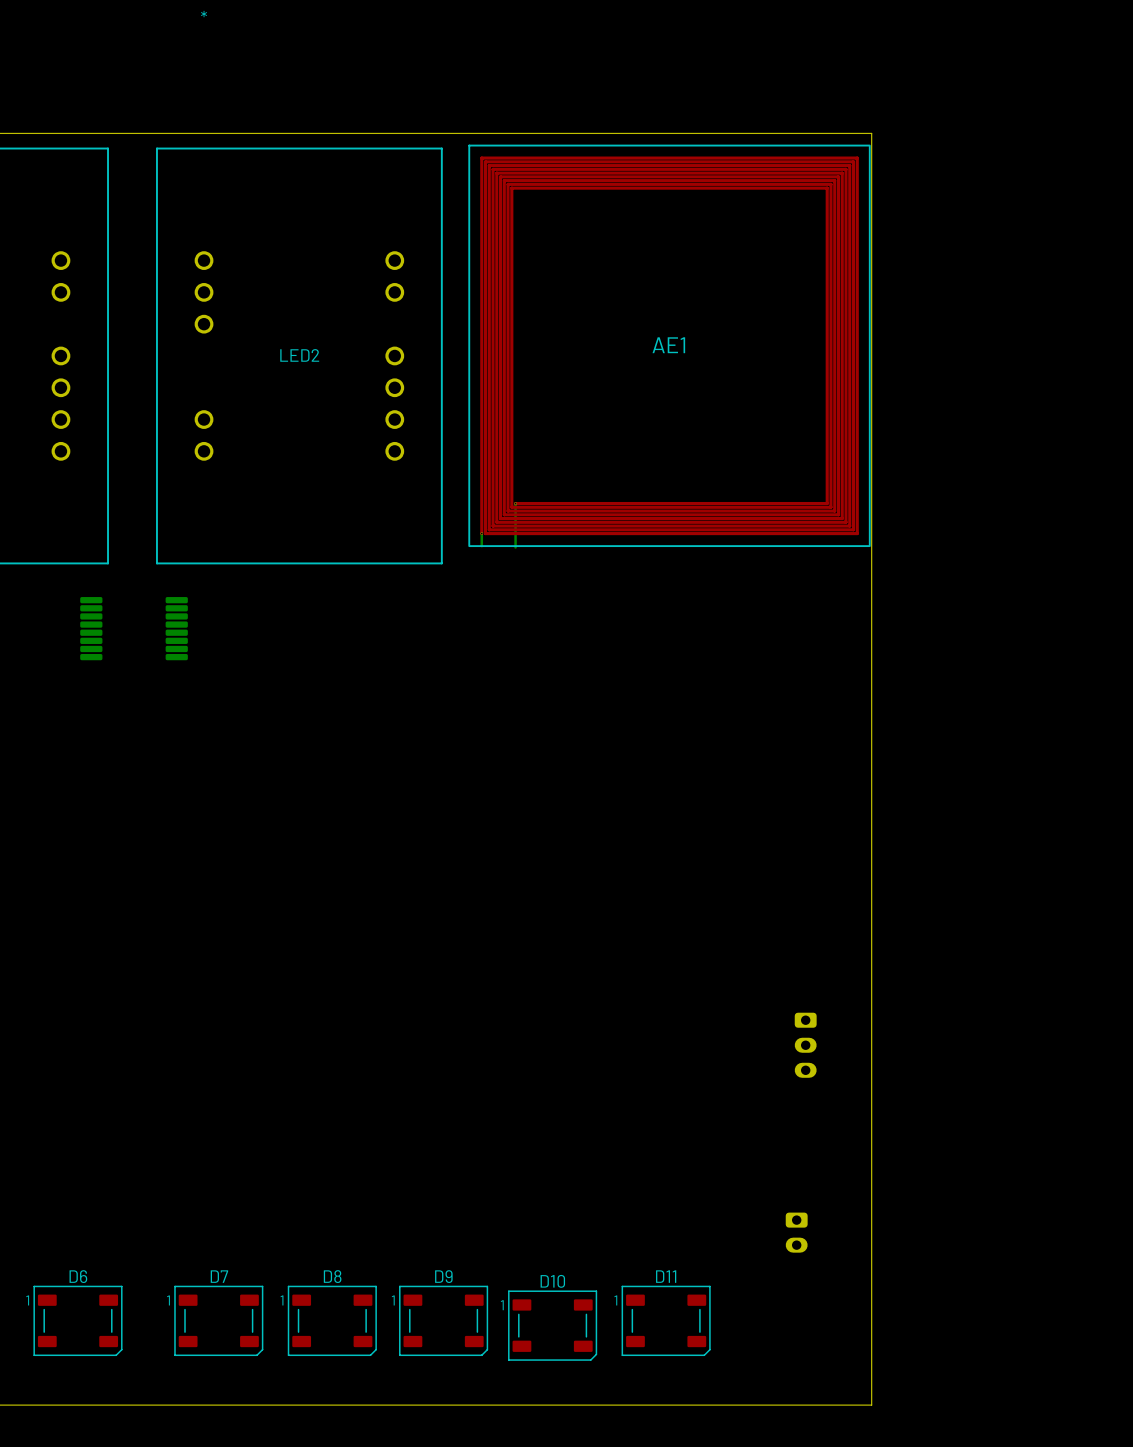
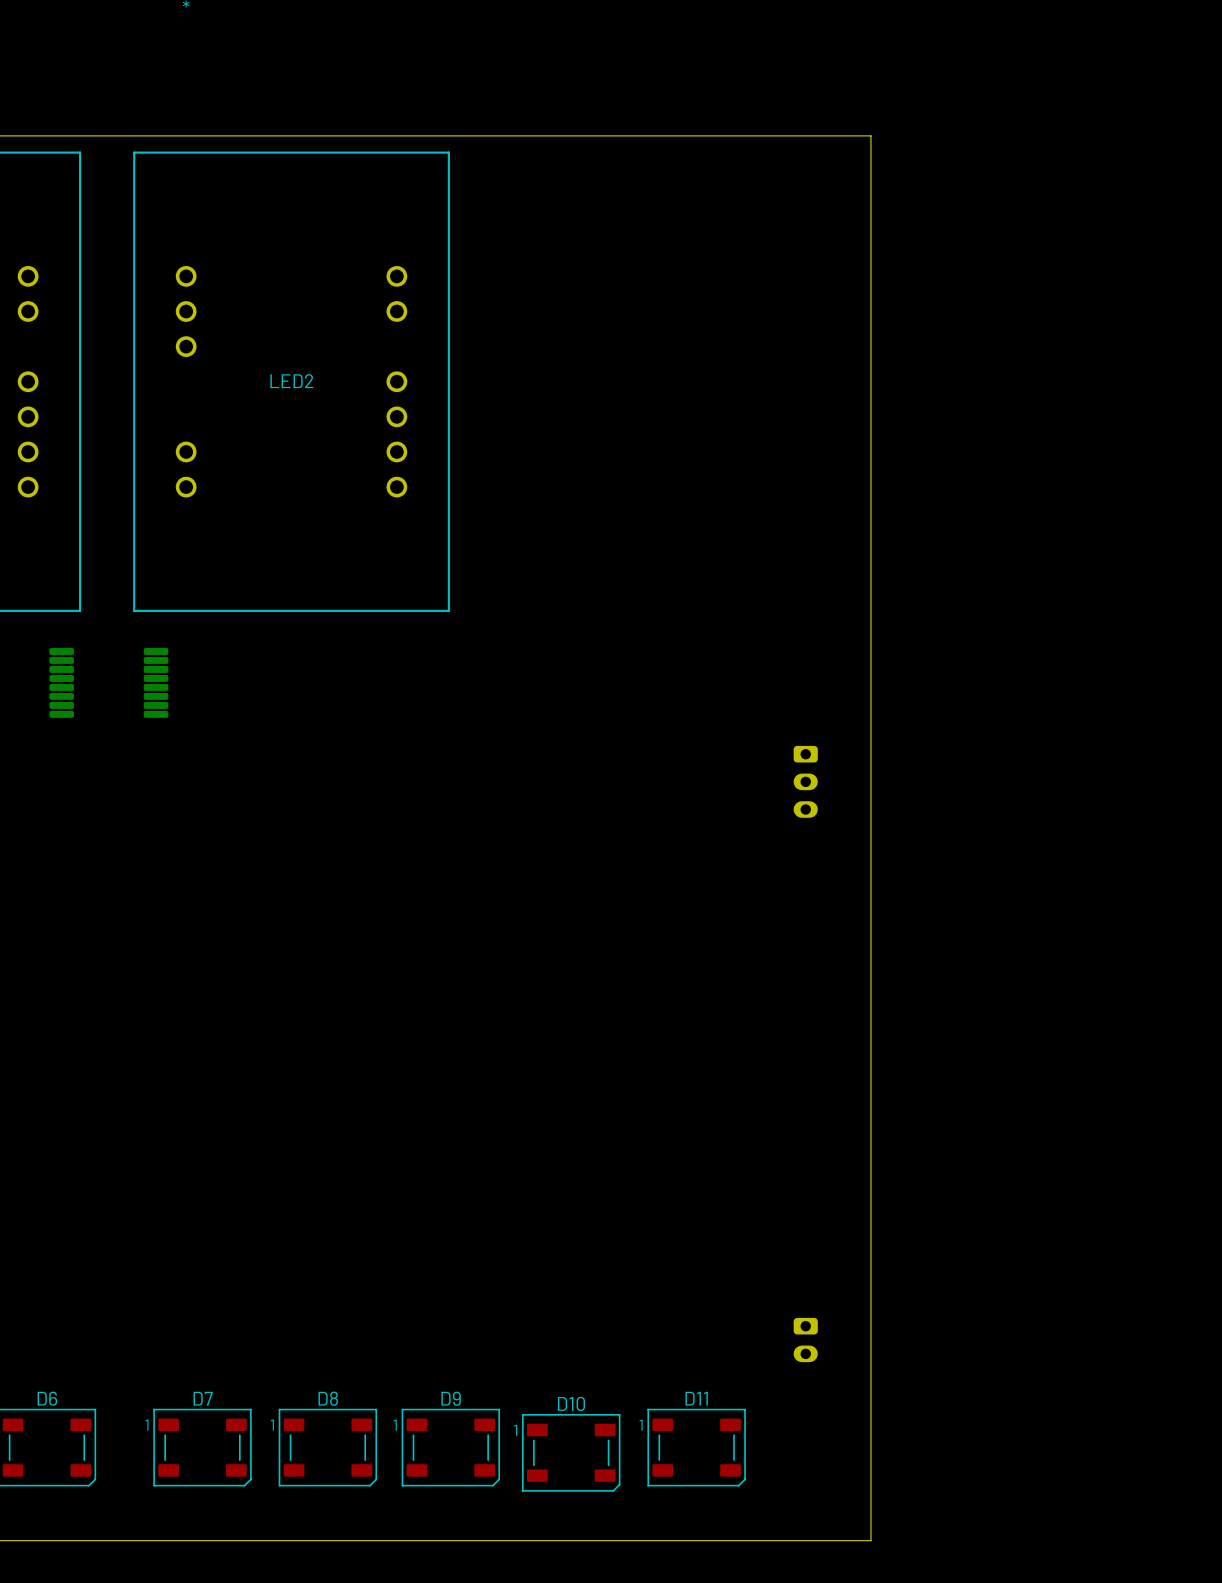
board edge: (823, 133) (871, 133) (871, 1405) (823, 1405) -> (870, 135) (870, 1540)
AE1: (669, 345) -> none
bottom track: (515, 503) (515, 547) -> none
bottom track: (481, 533) (481, 545) -> none
part: none -> (805, 781)
part: (805, 1045) -> none
part position: (796, 1232) -> (805, 1340)

